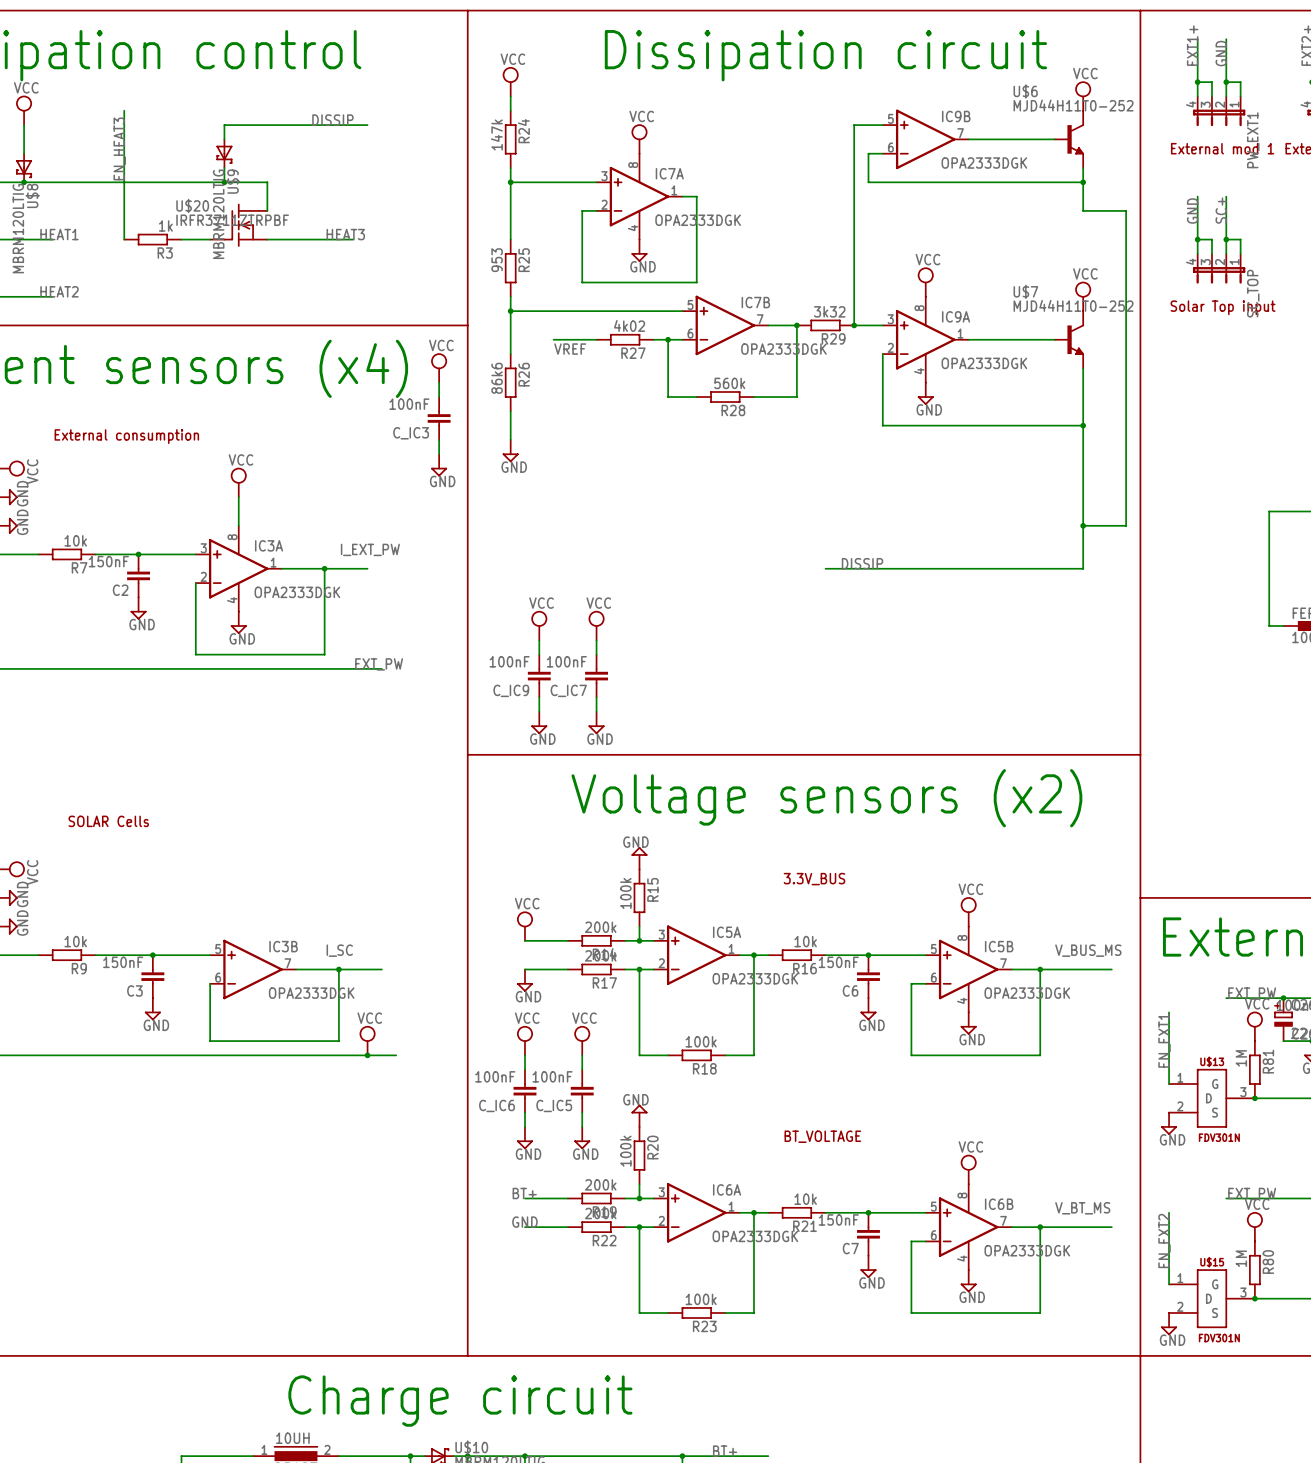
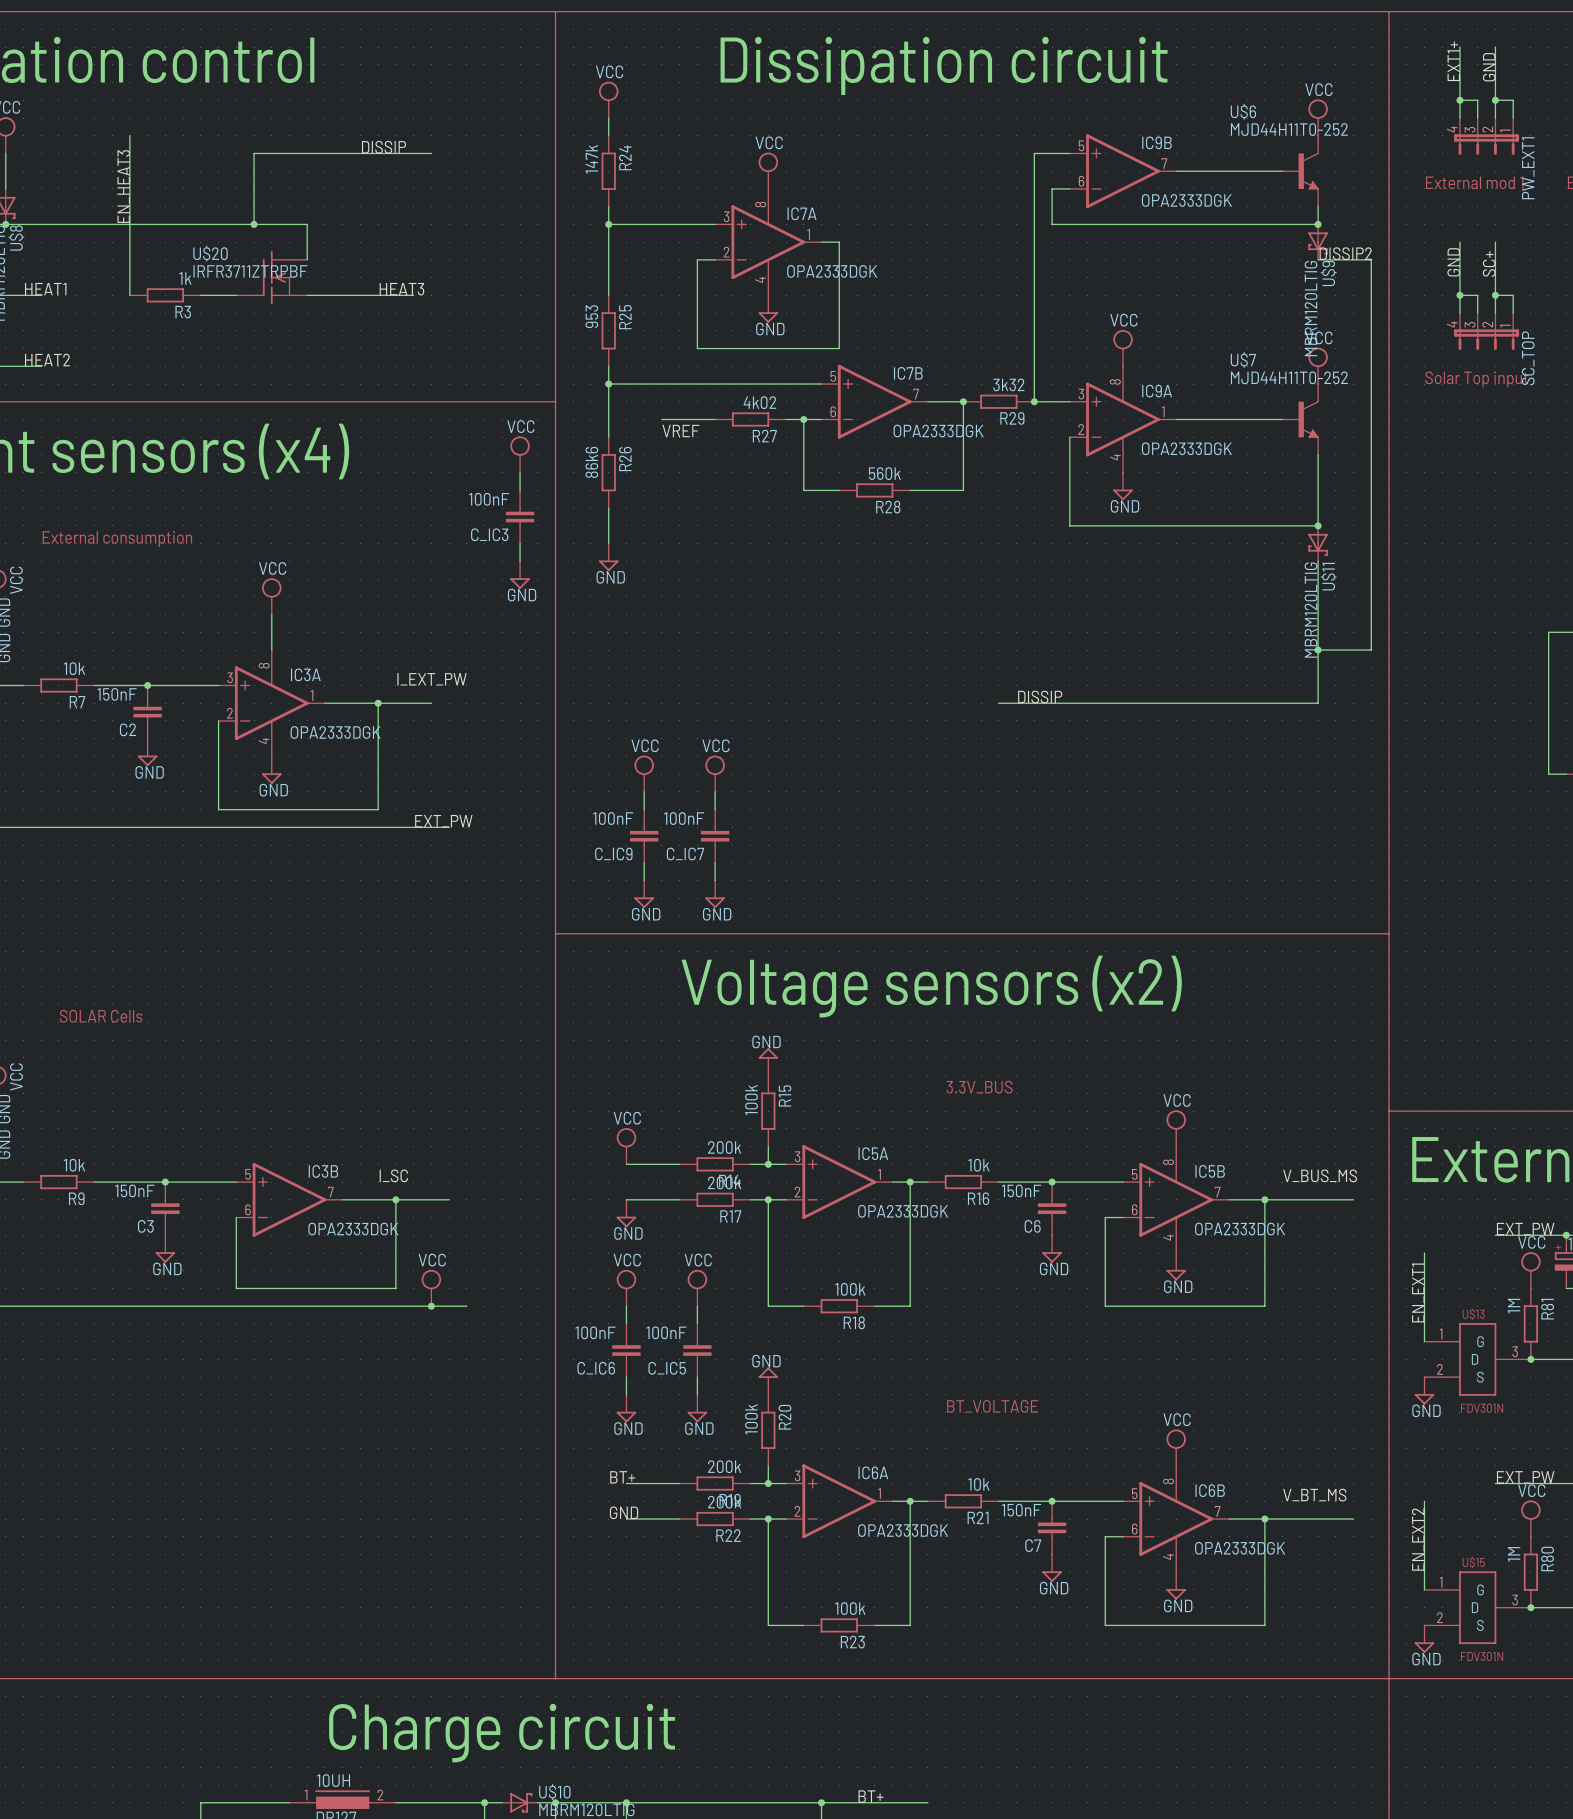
U$9 position: (224, 153) -> (1318, 242)
label: none -> DISSIP2 (1345, 253)
U$11: none -> MBRM120LTIG (1318, 543)

